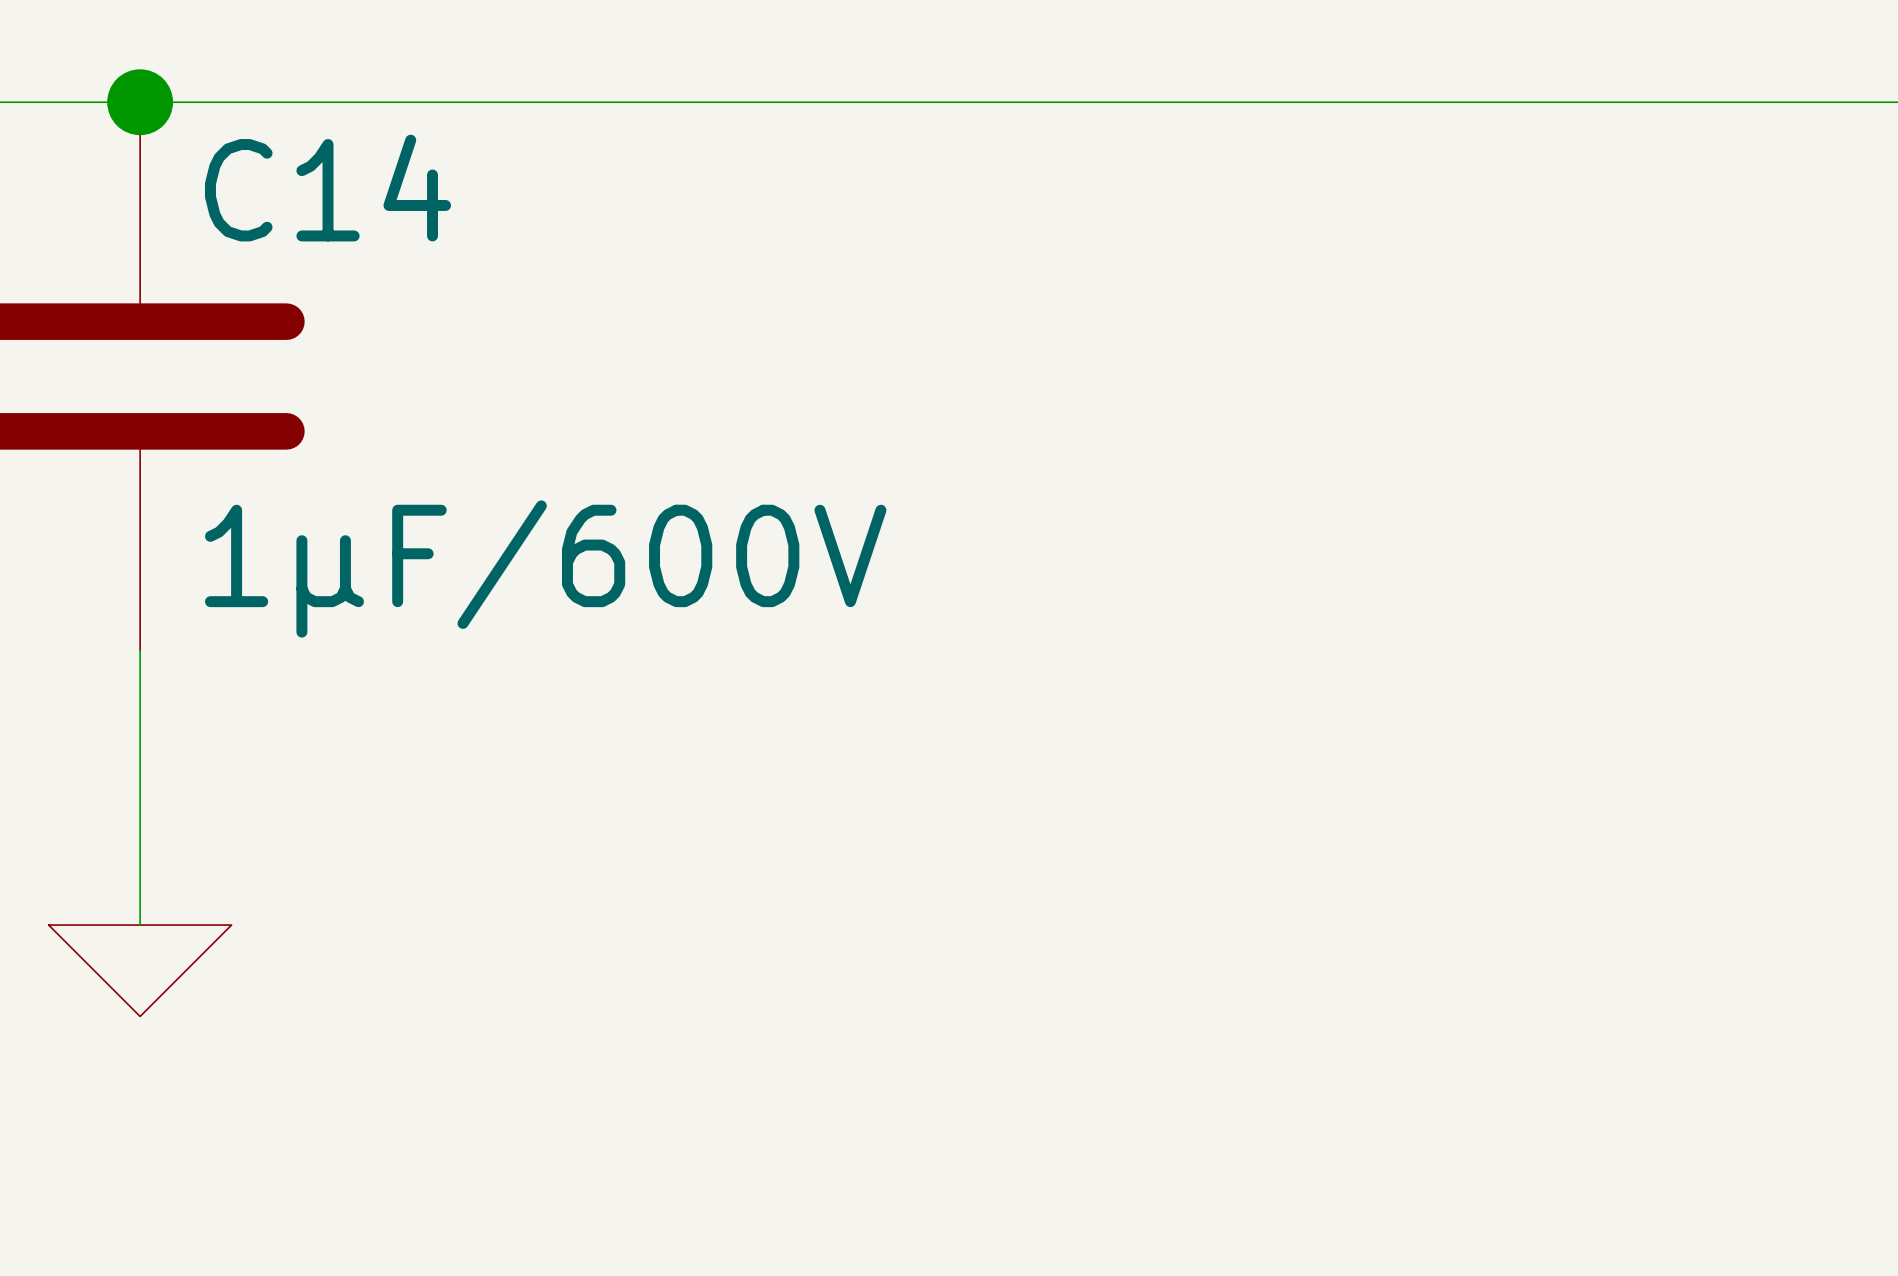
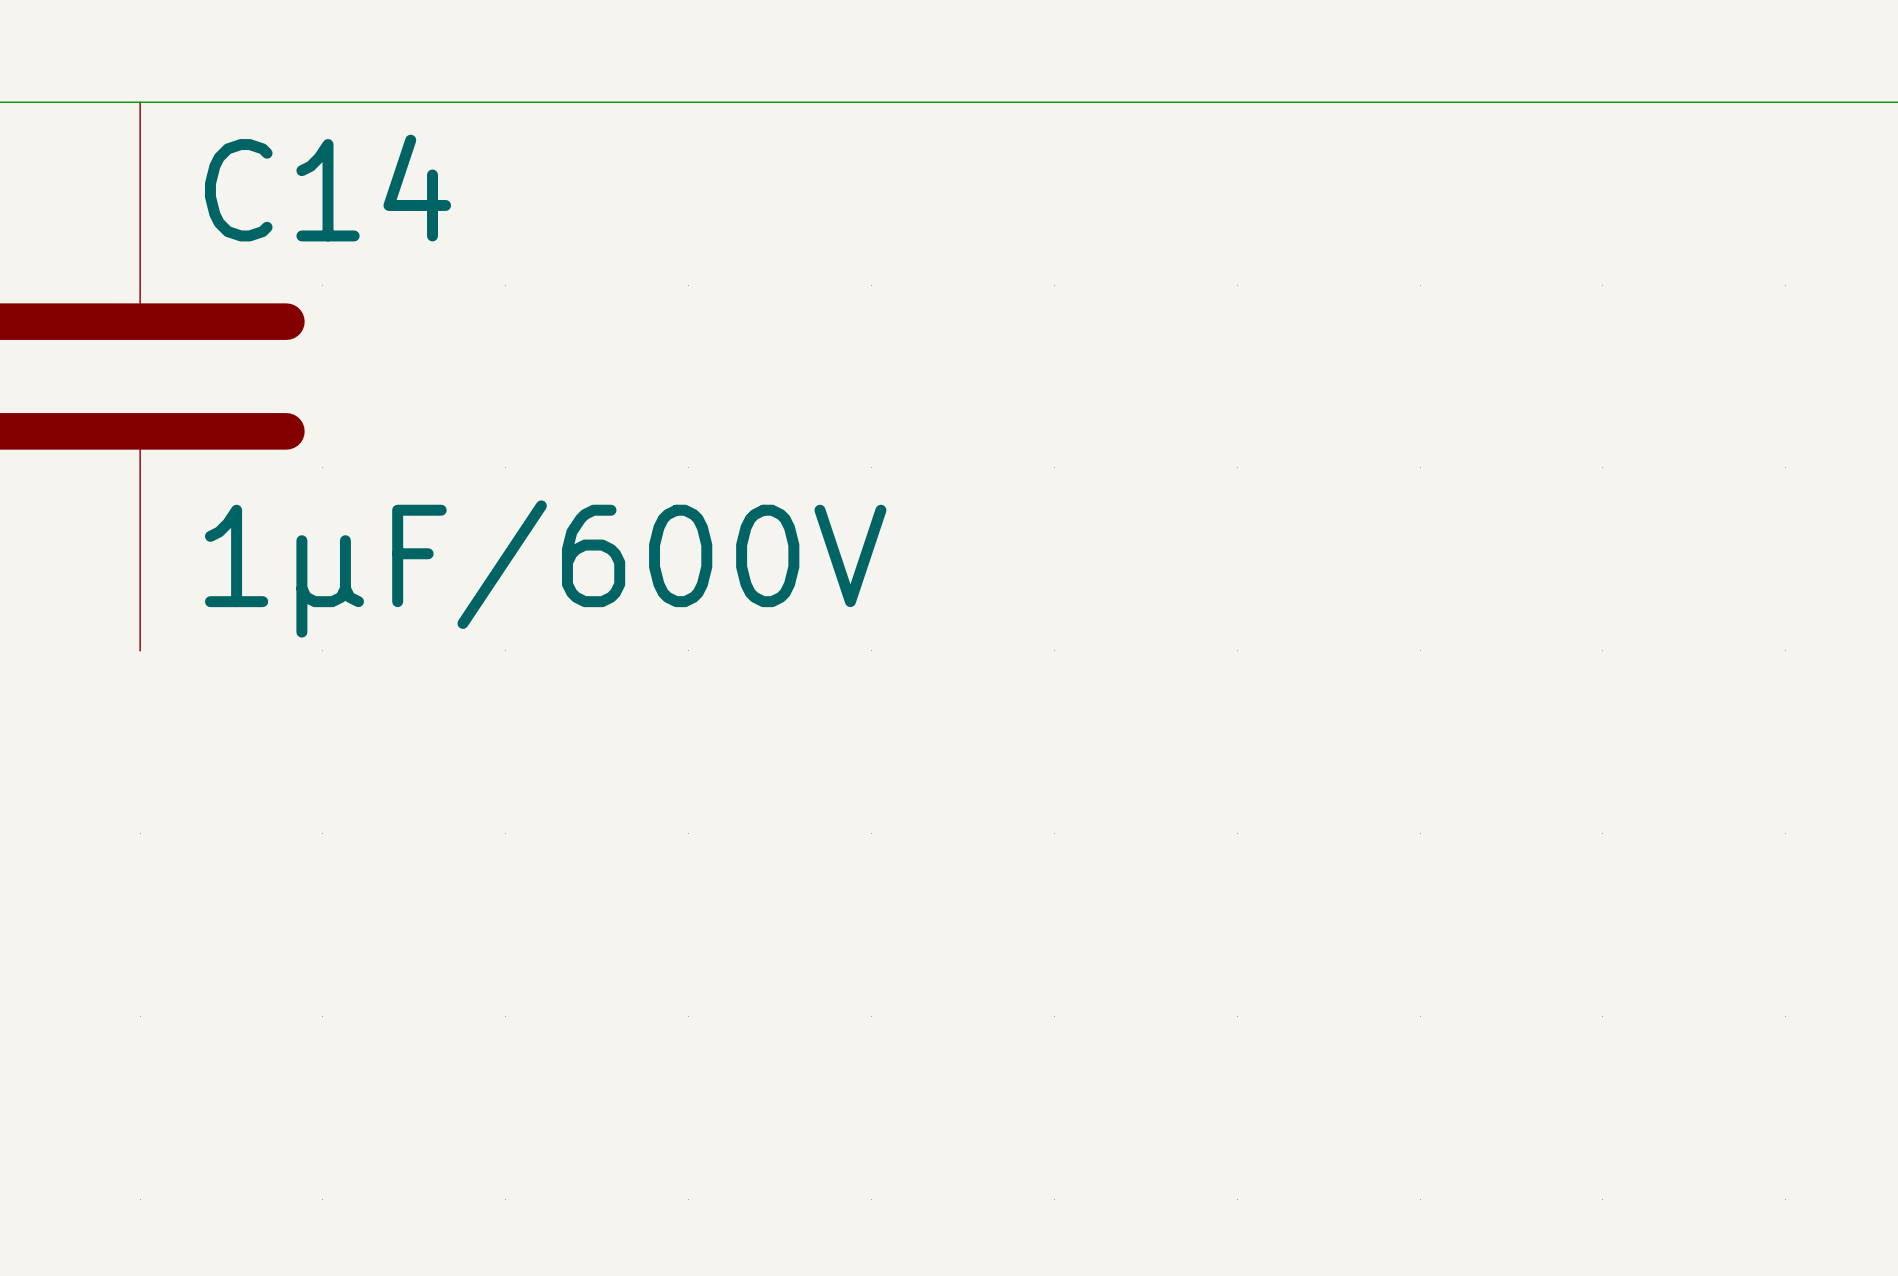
junction: (140, 102) -> none
wire: (140, 650) (140, 925) -> none
power symbol: (140, 970) -> none

